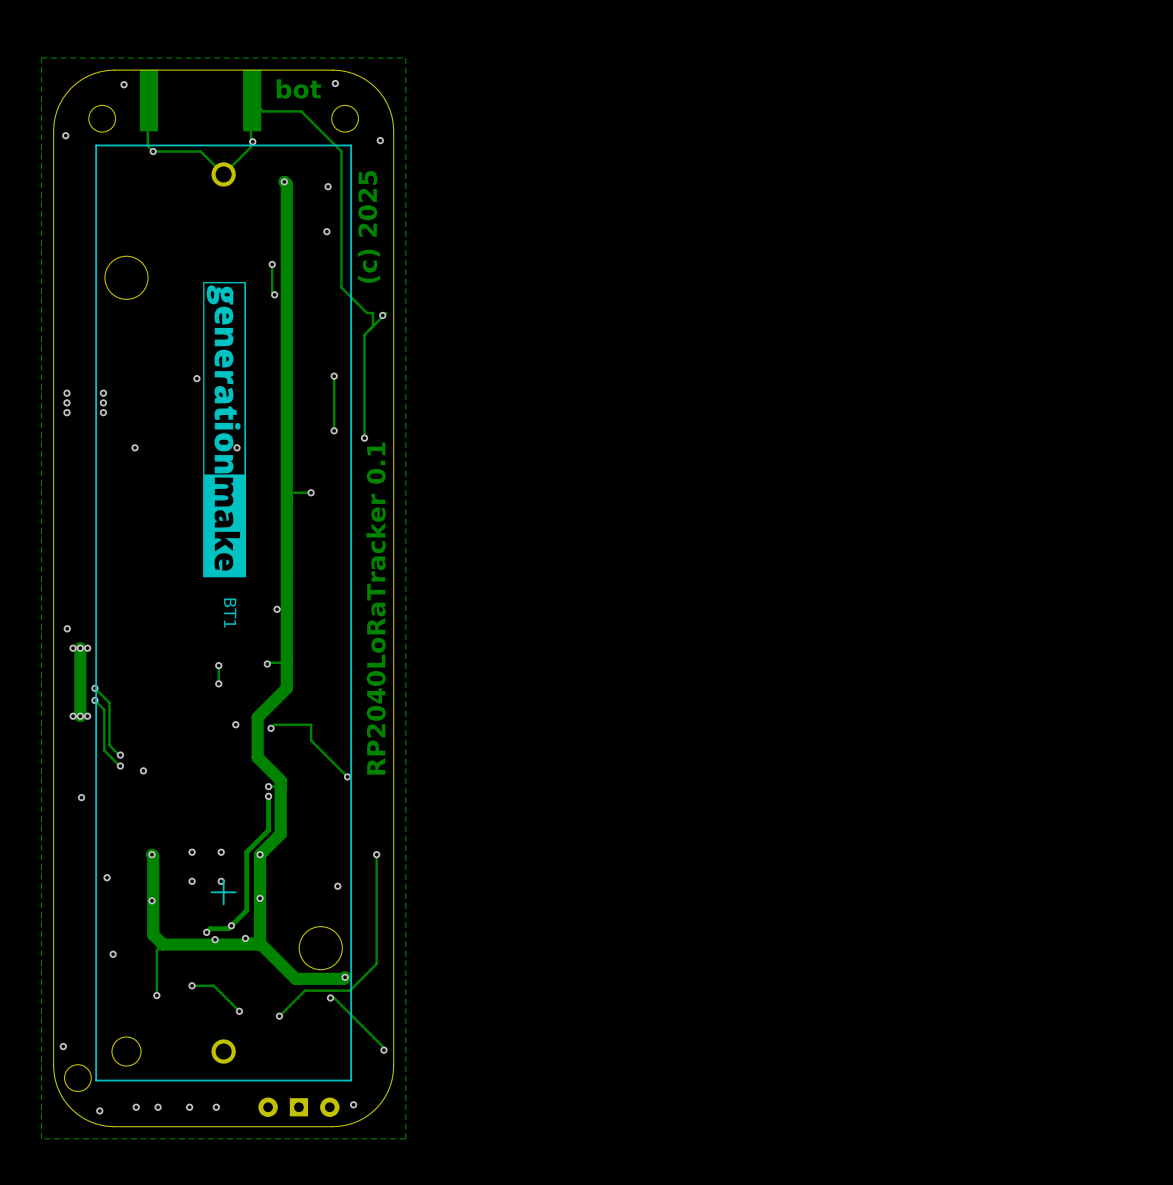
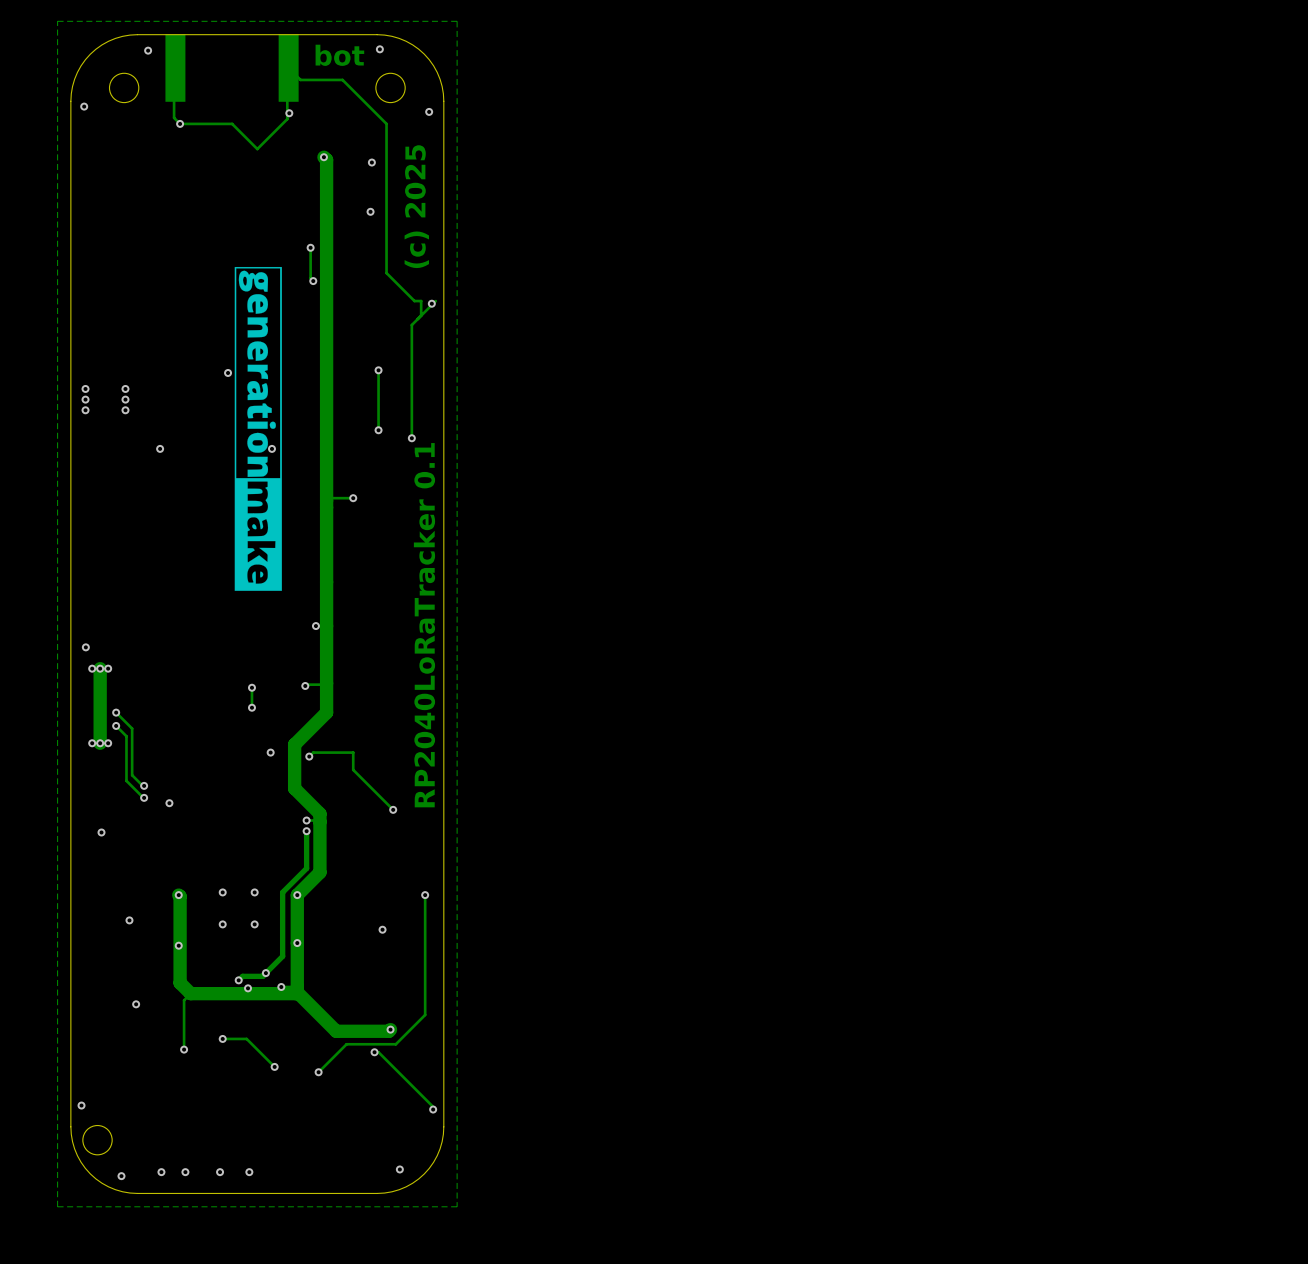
BT1: (223, 613) -> none
part: (298, 1107) -> none

